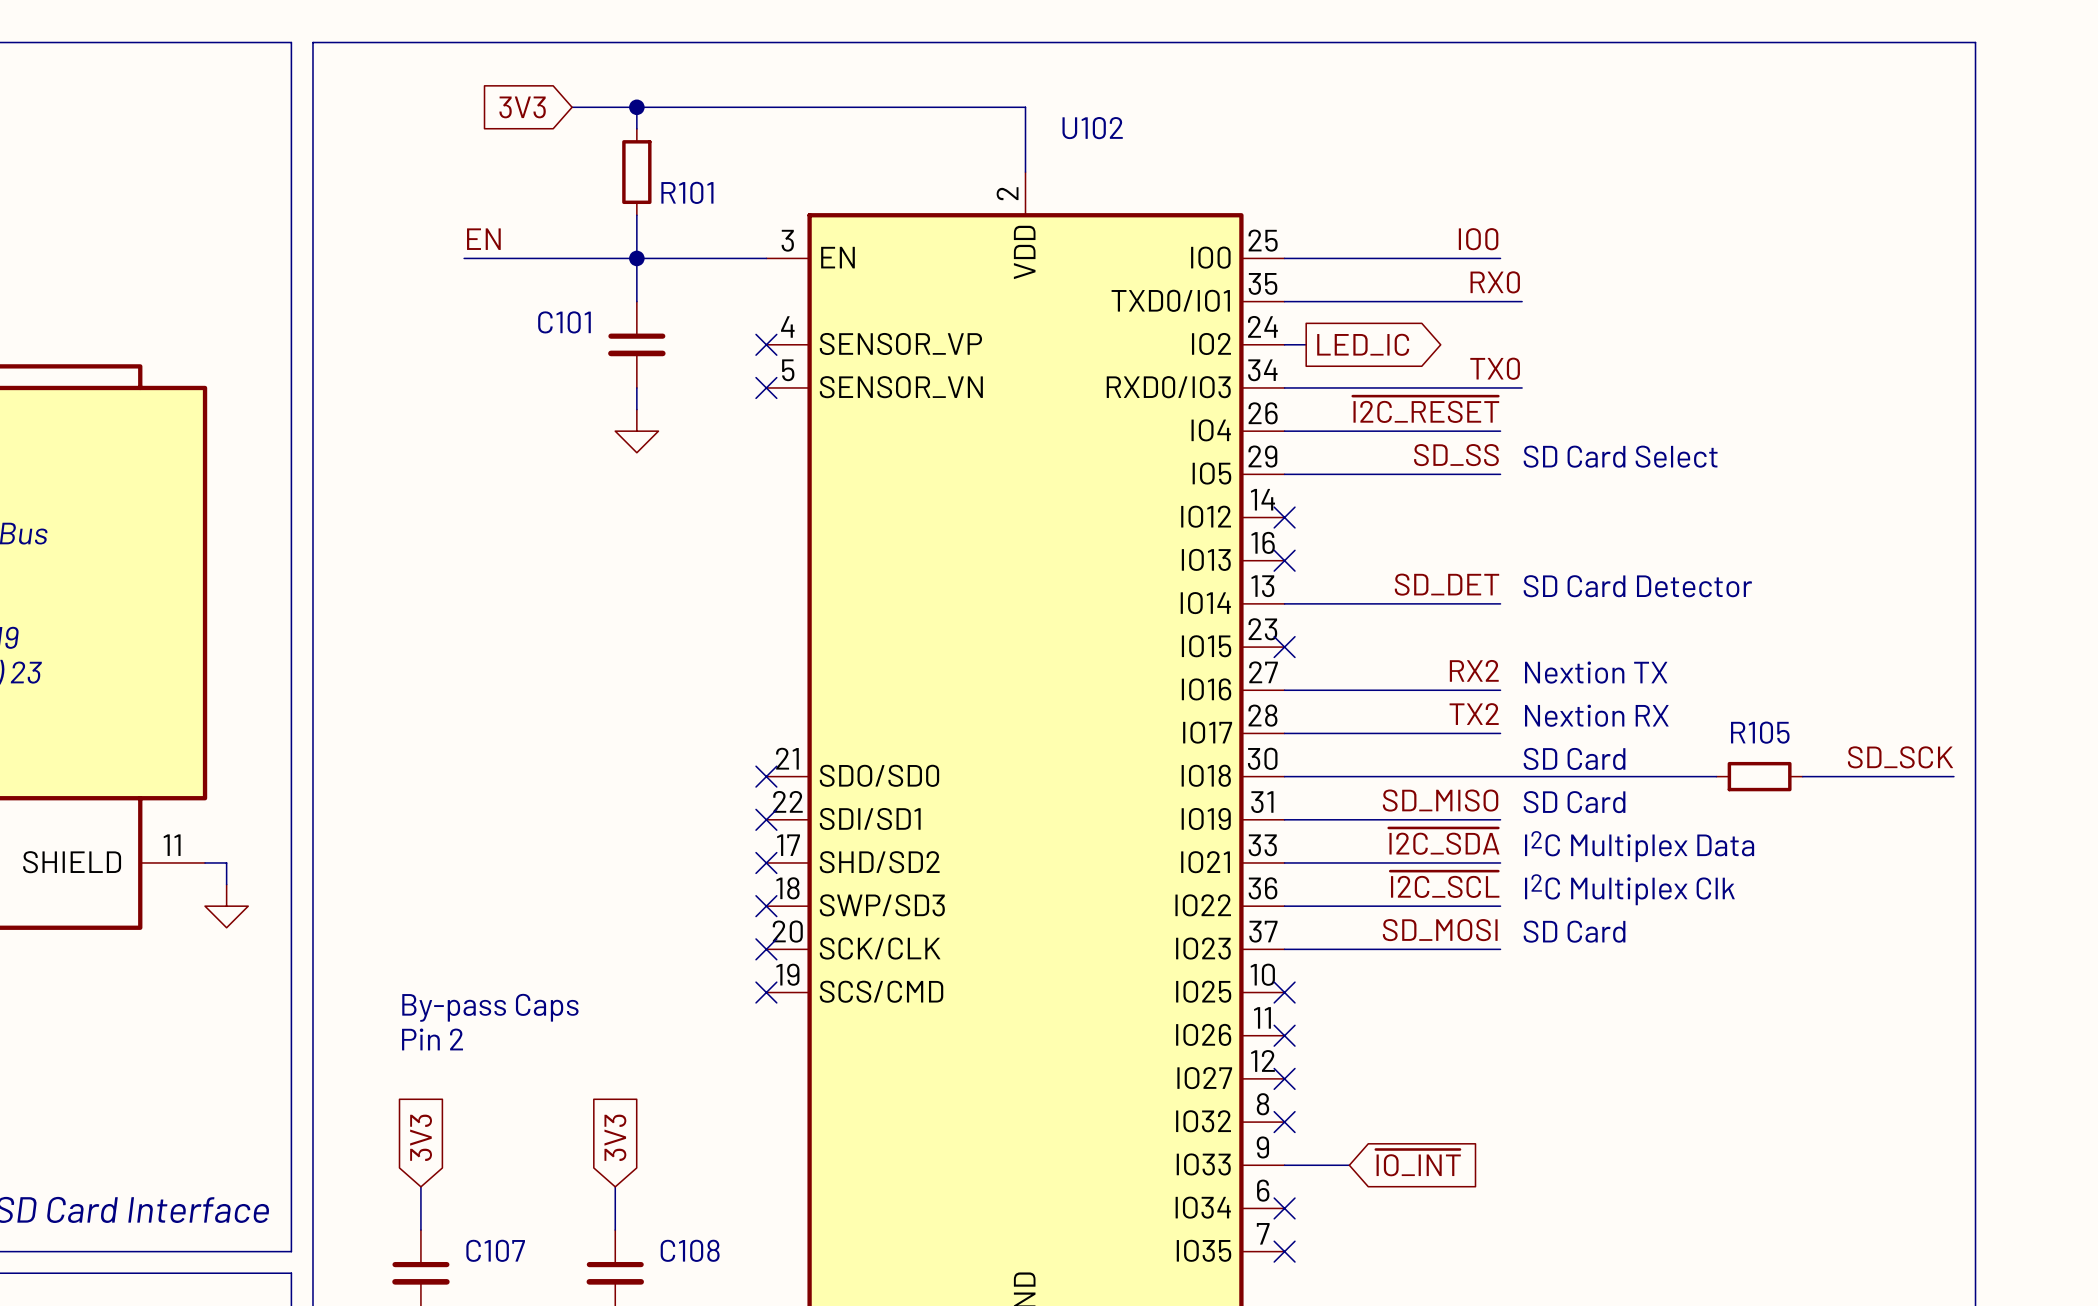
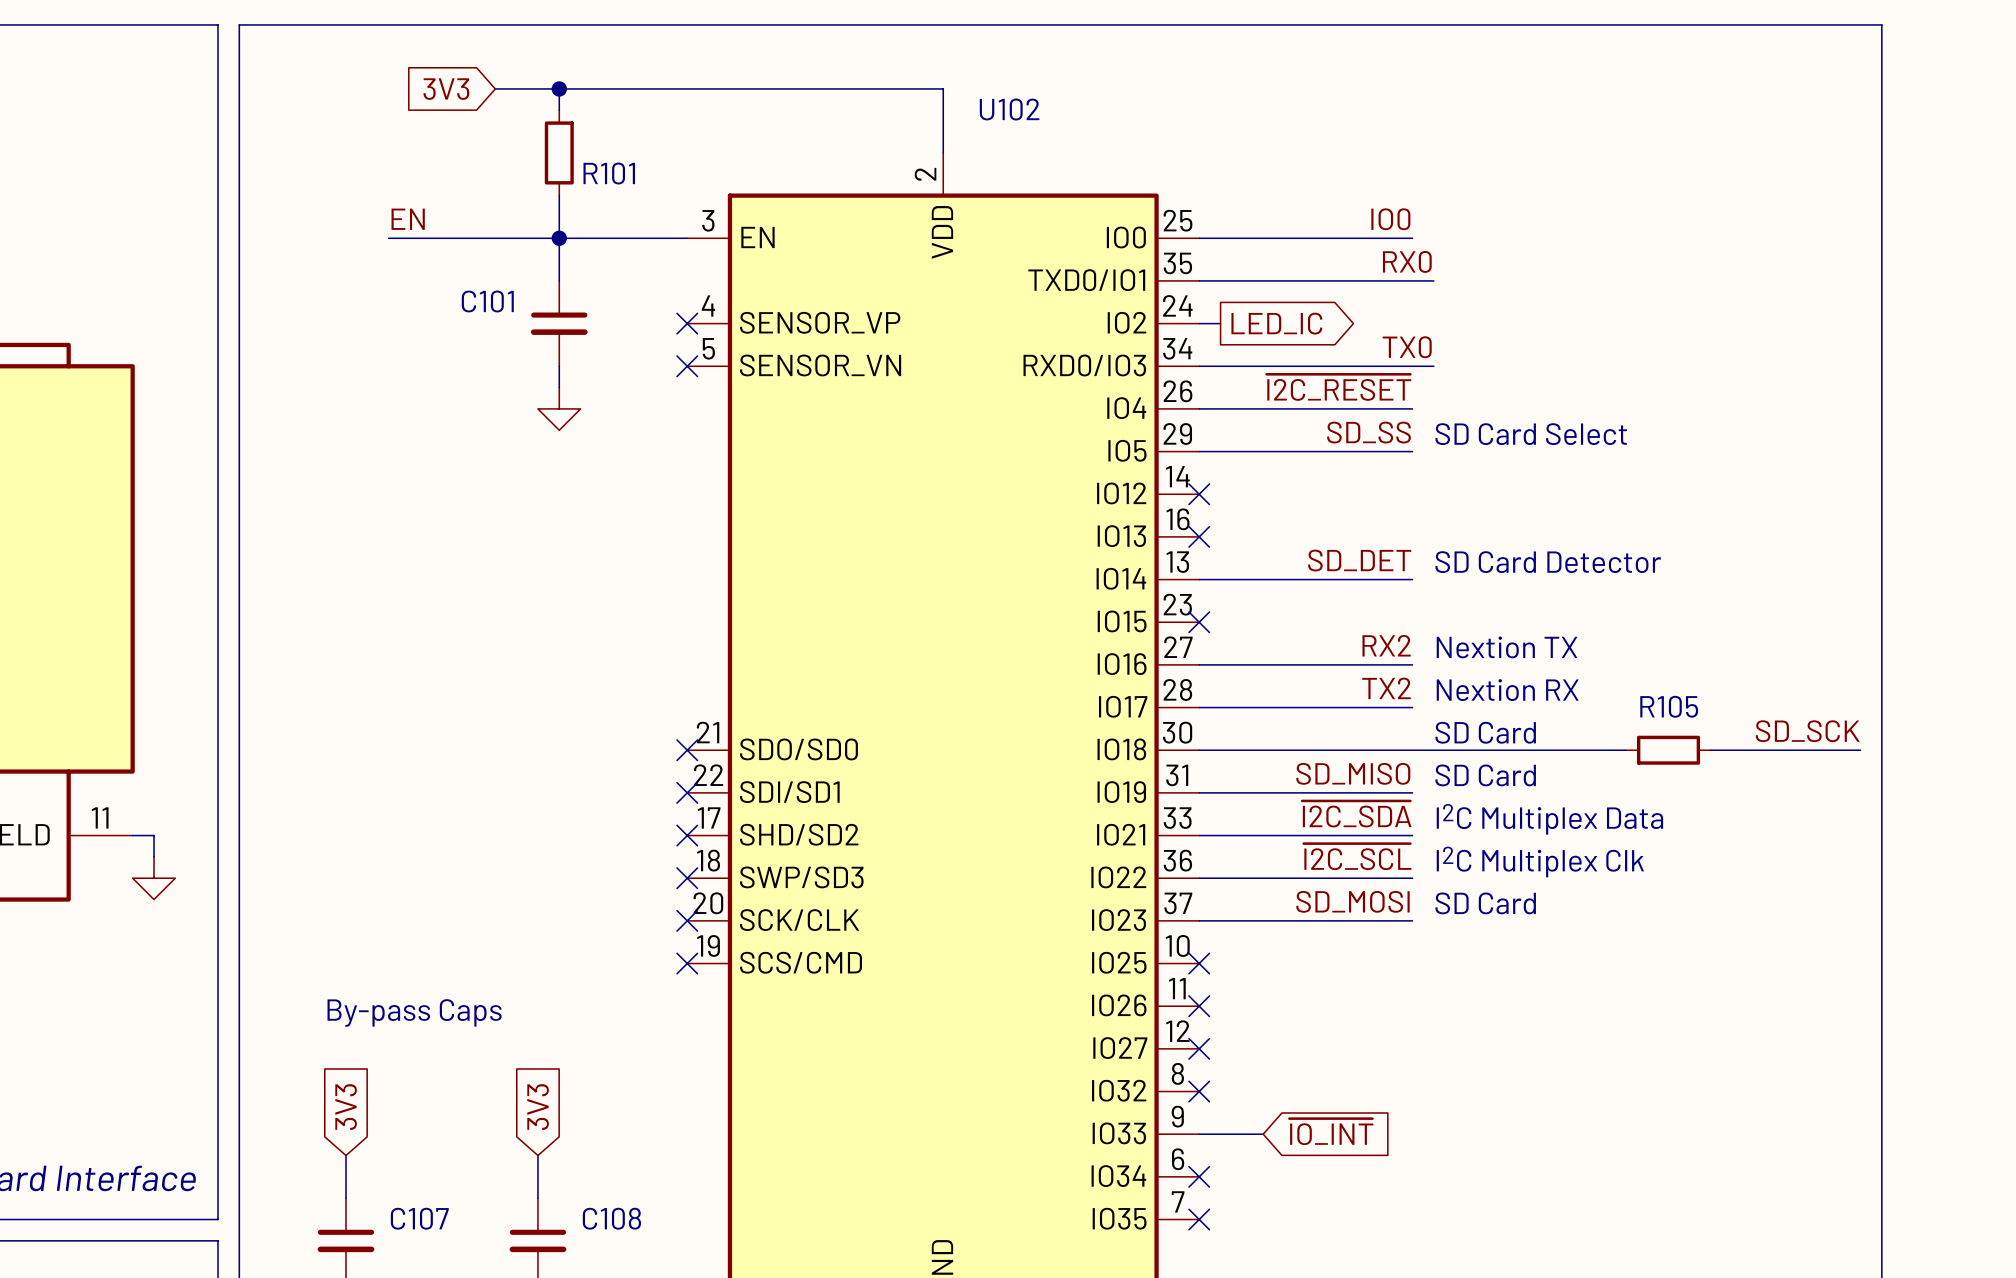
text: By-pass Caps (490, 1007) -> none
text: Pin 2 (432, 1039) -> By-pass Caps (414, 1012)

